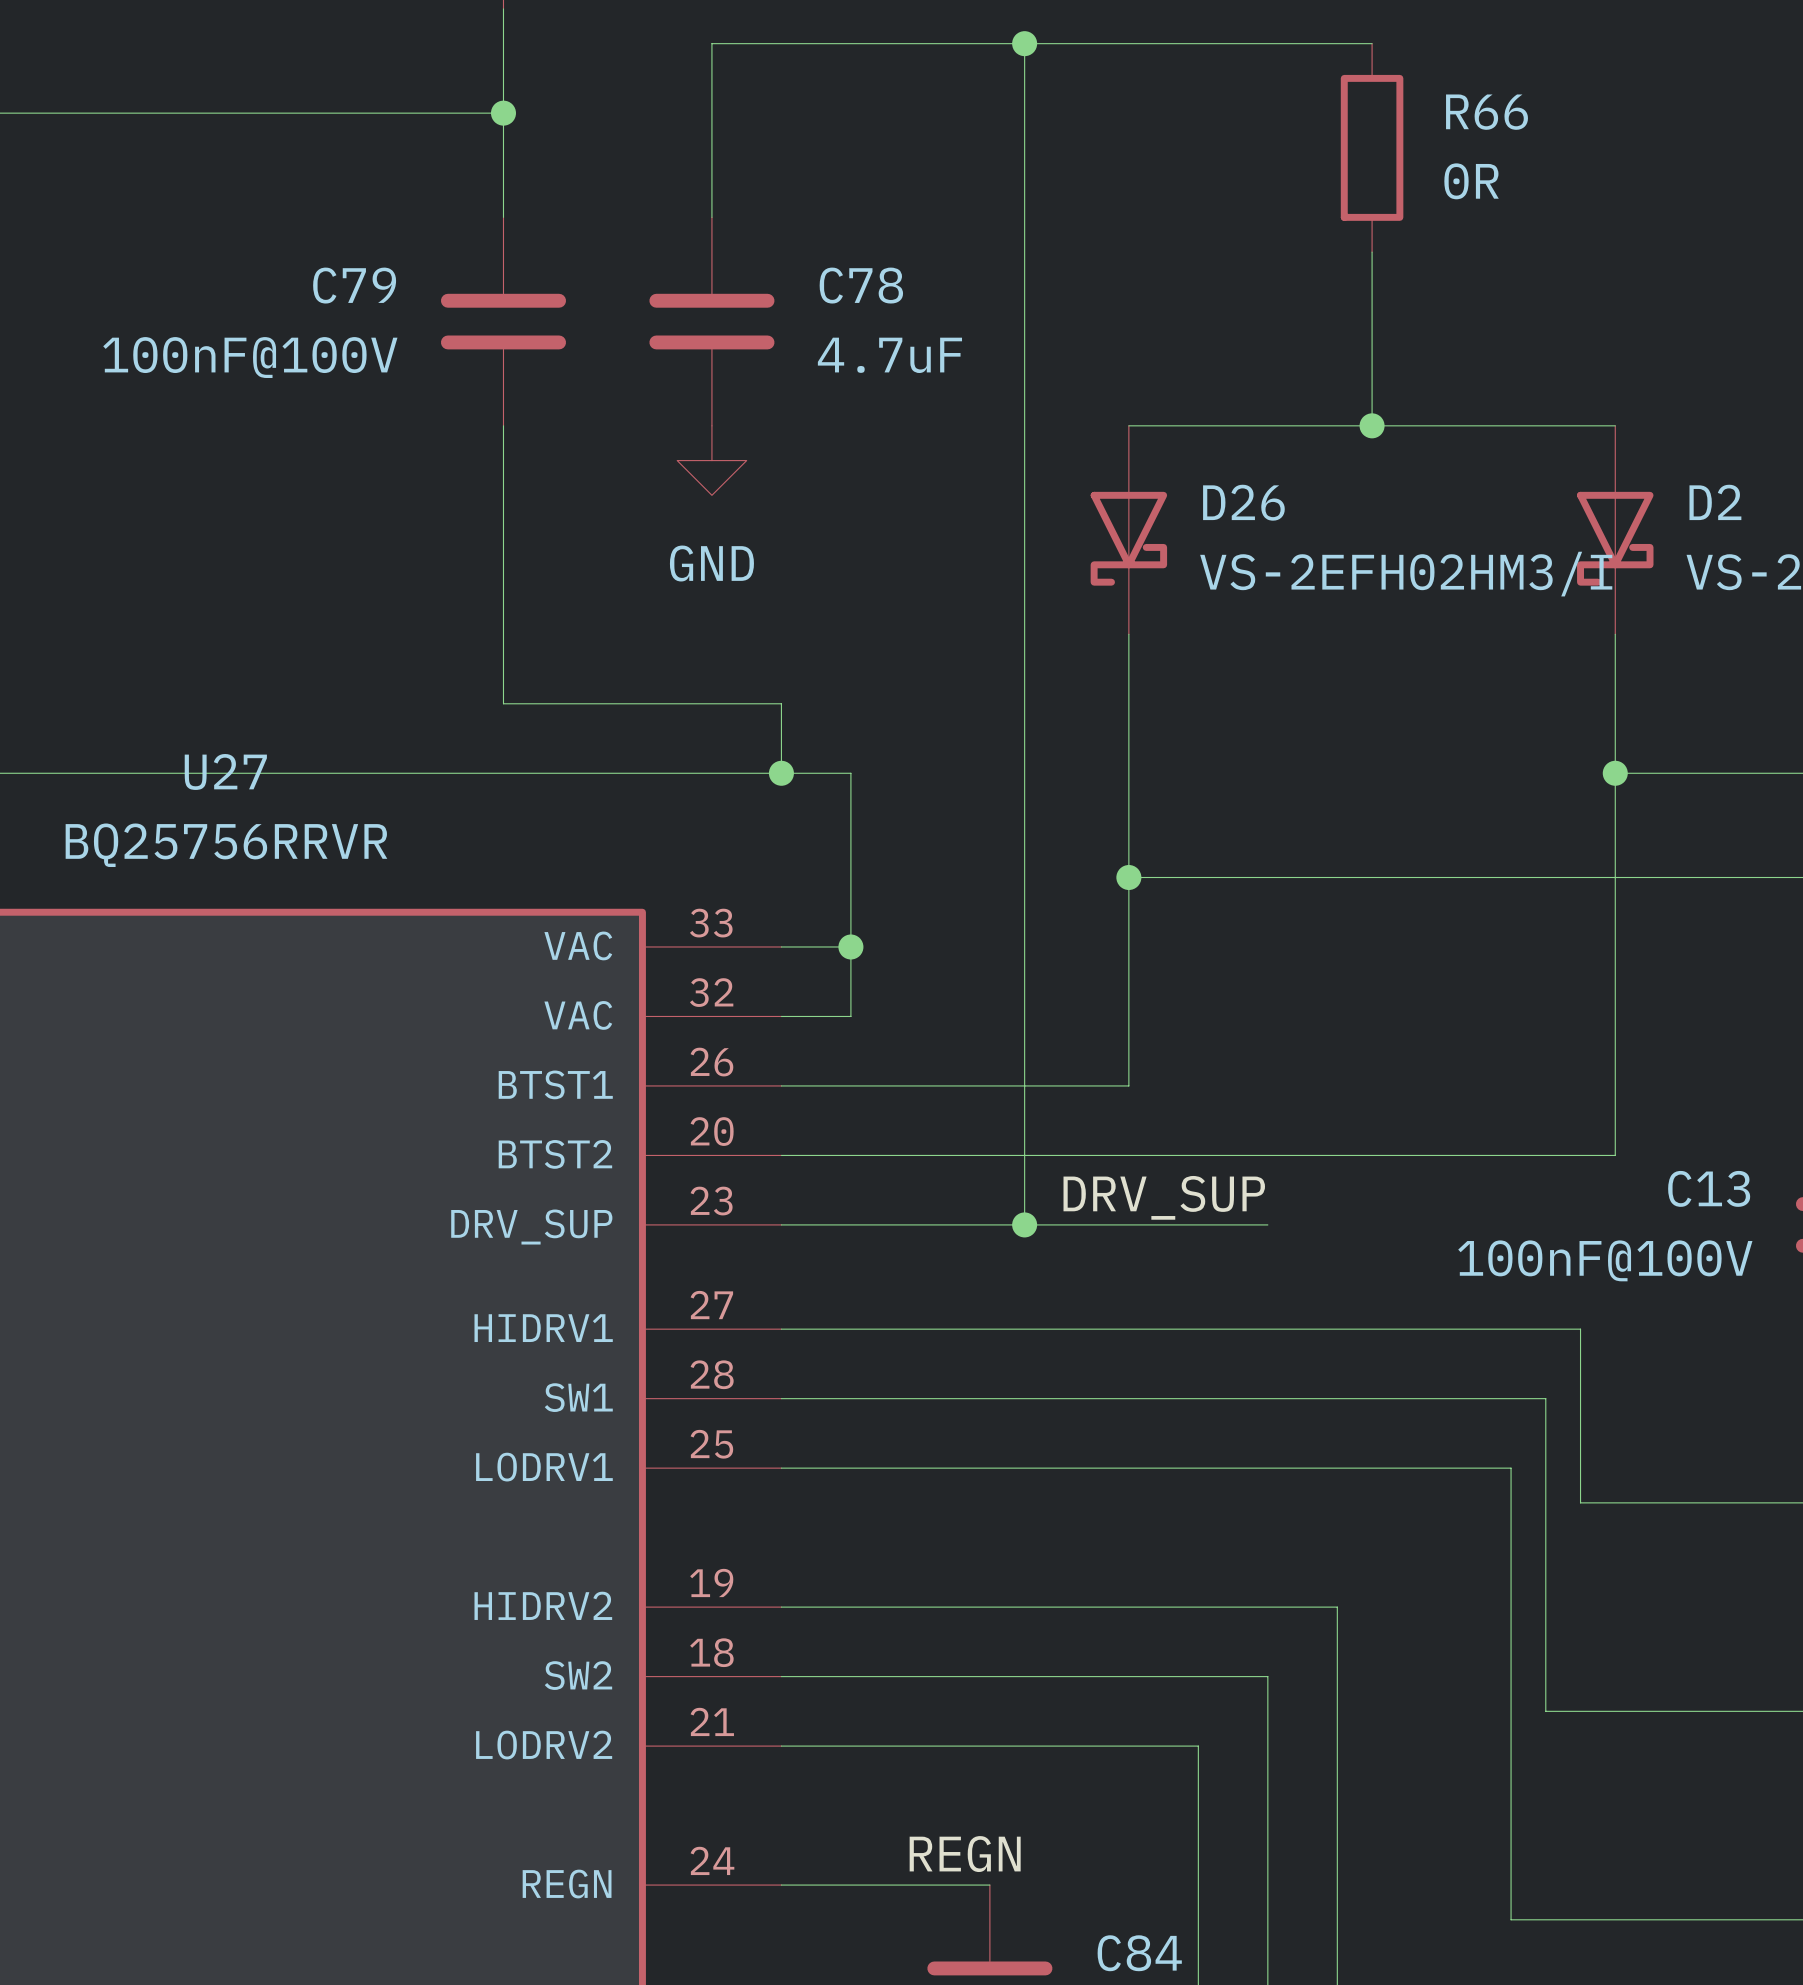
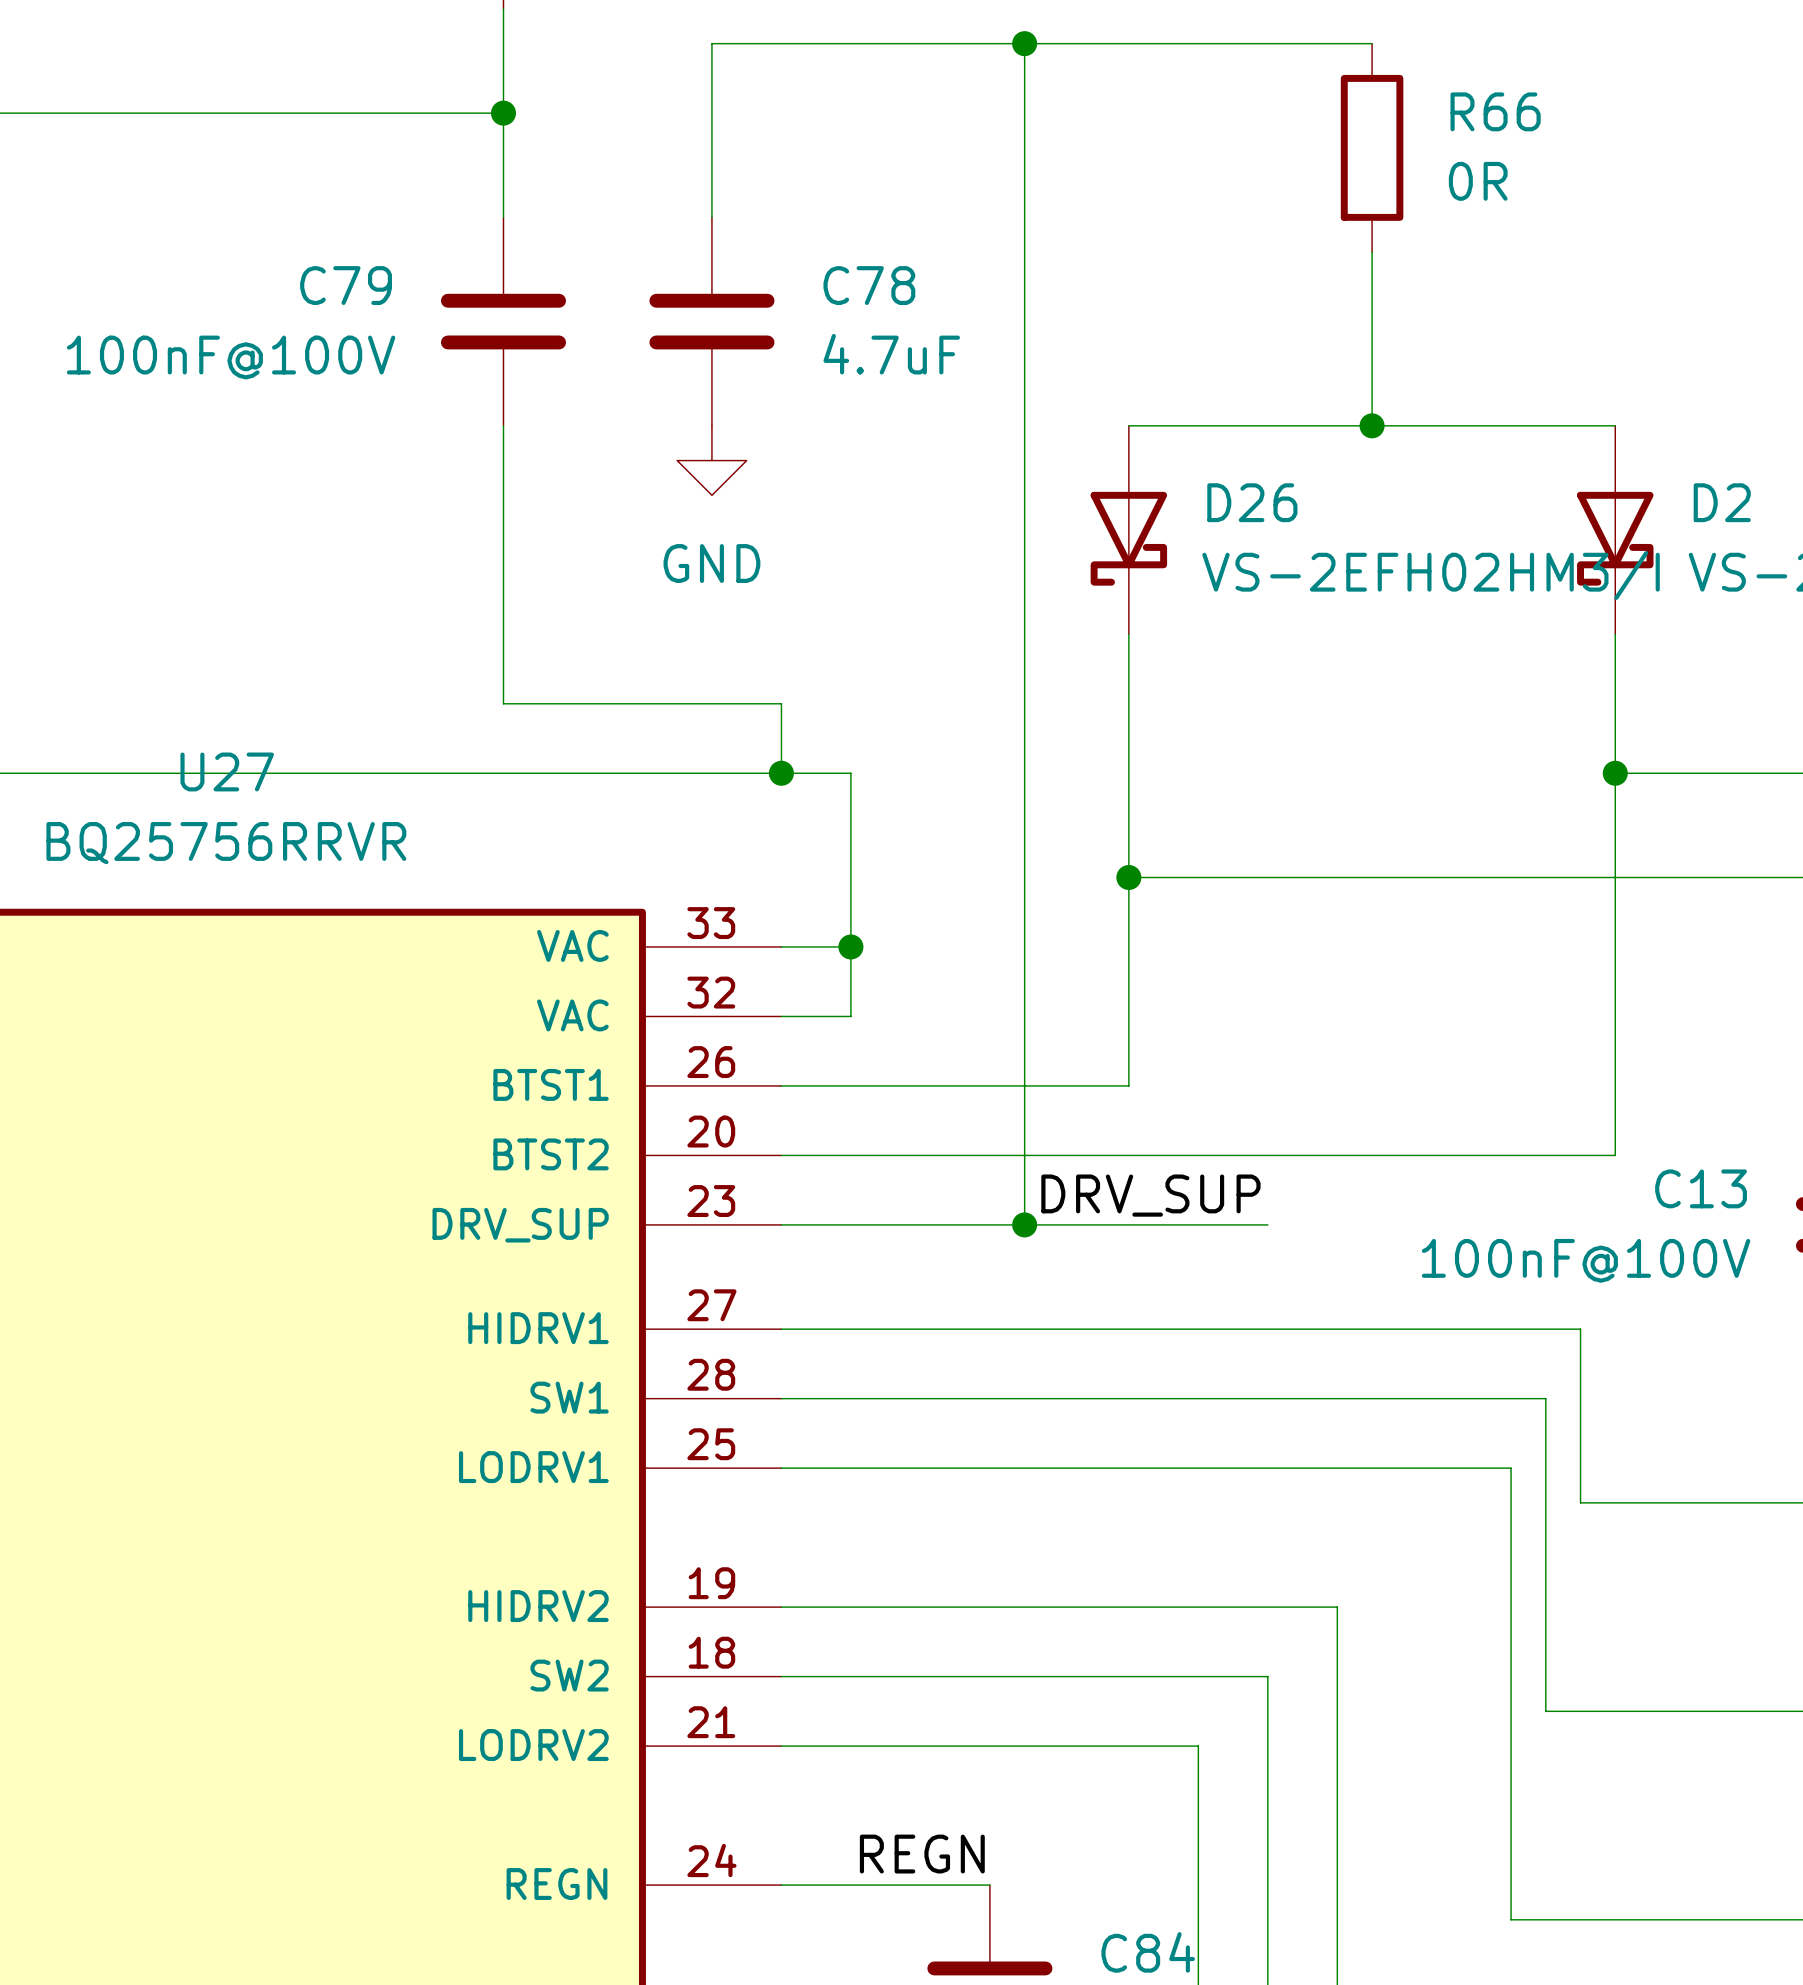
label position: REGN (965, 1854) -> REGN (922, 1854)

